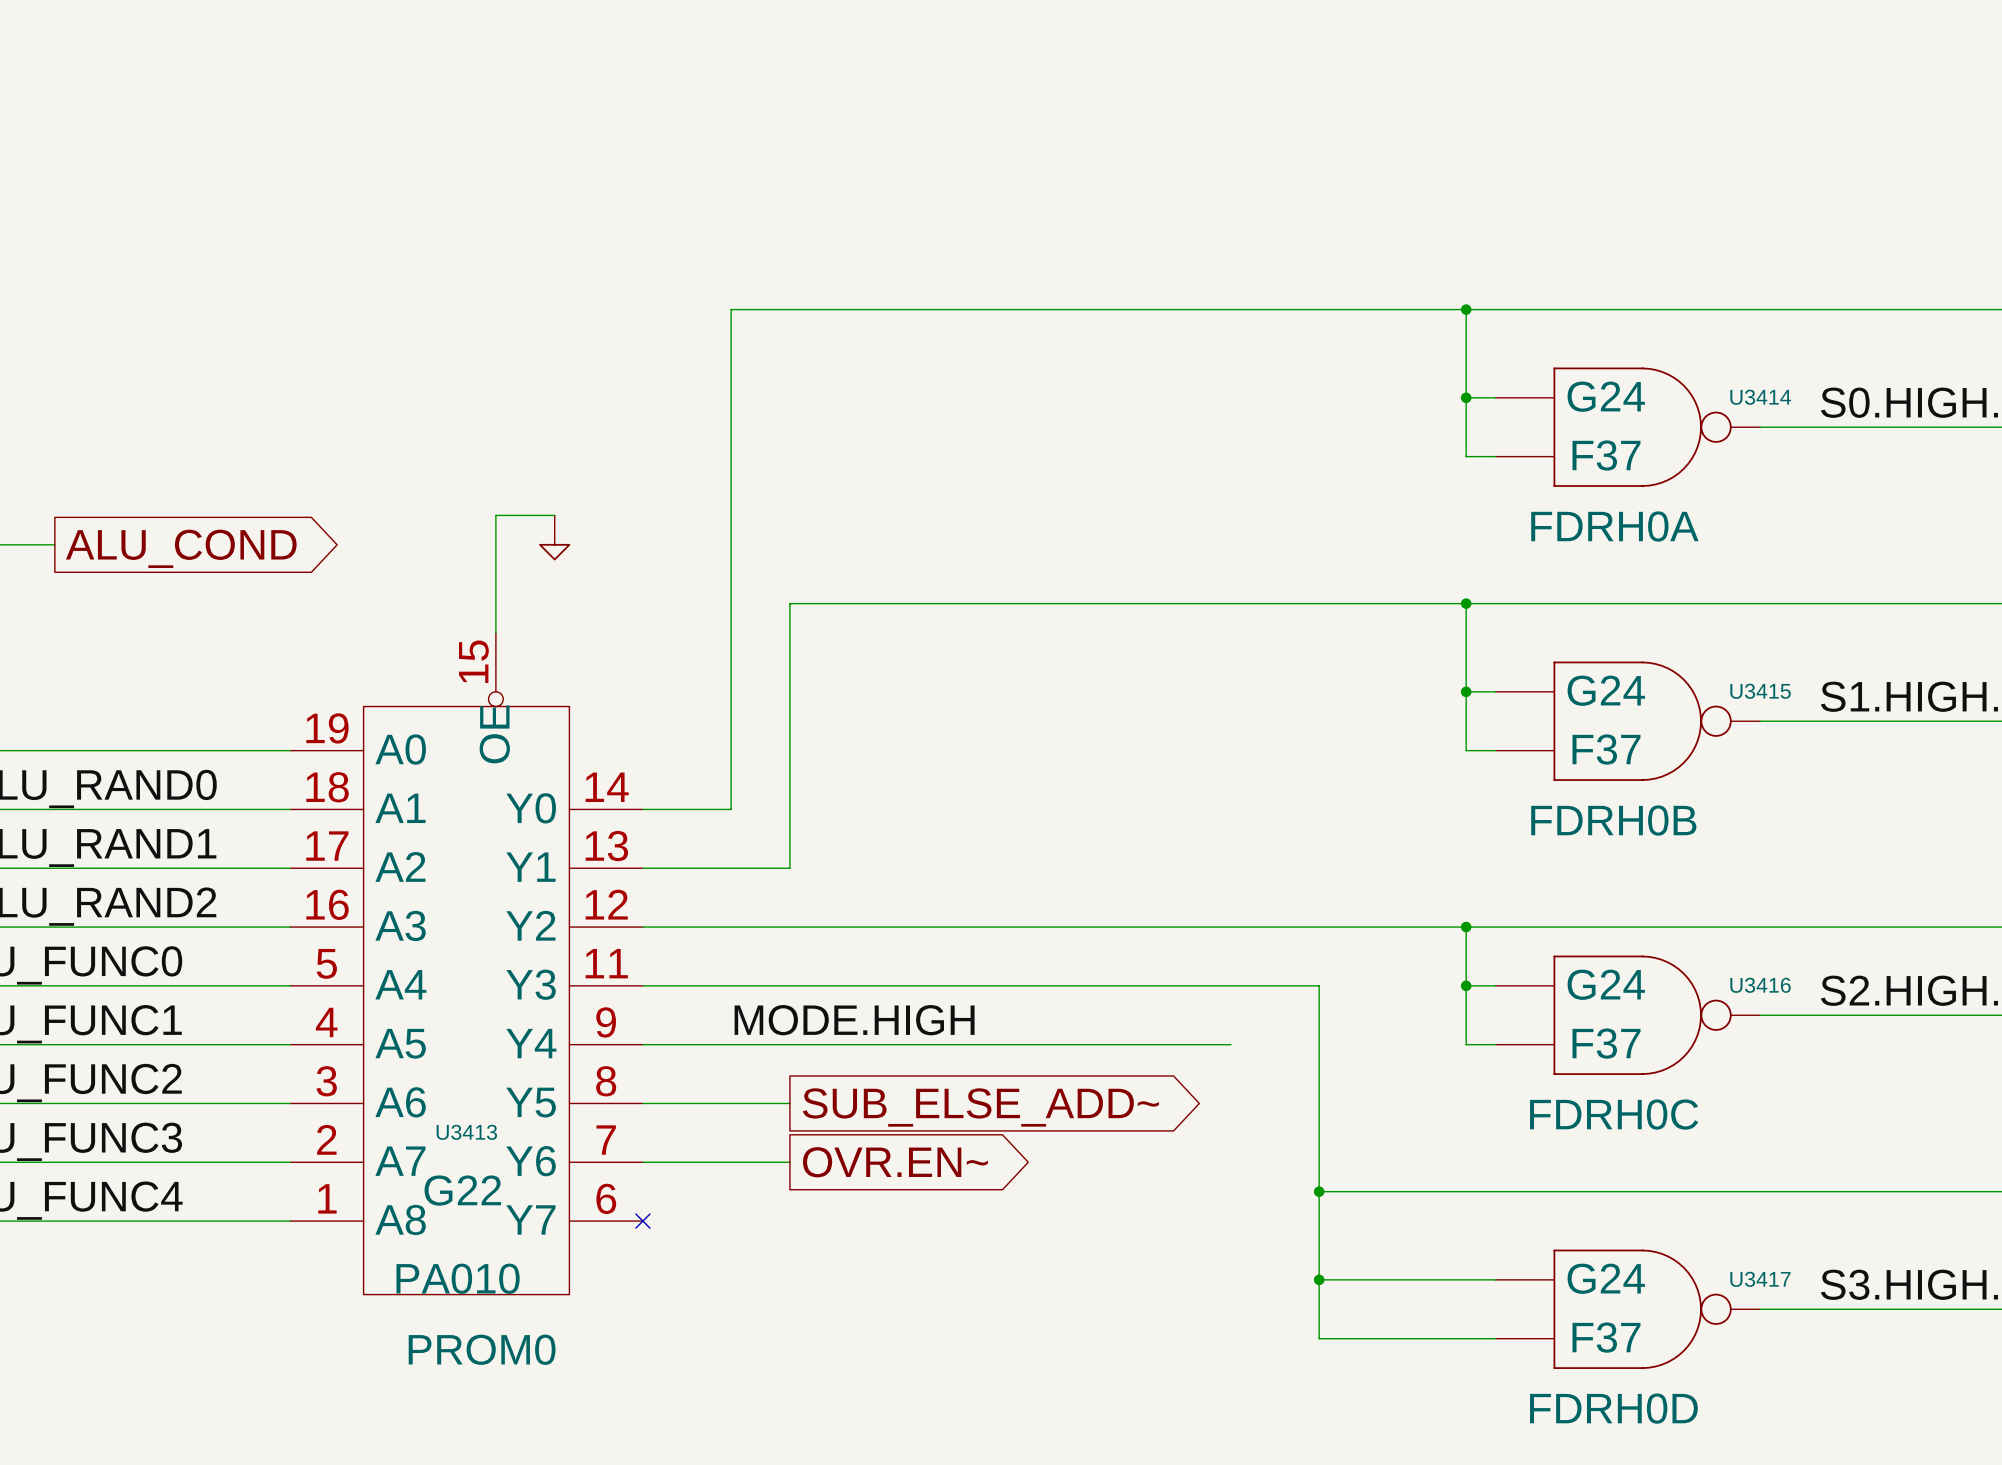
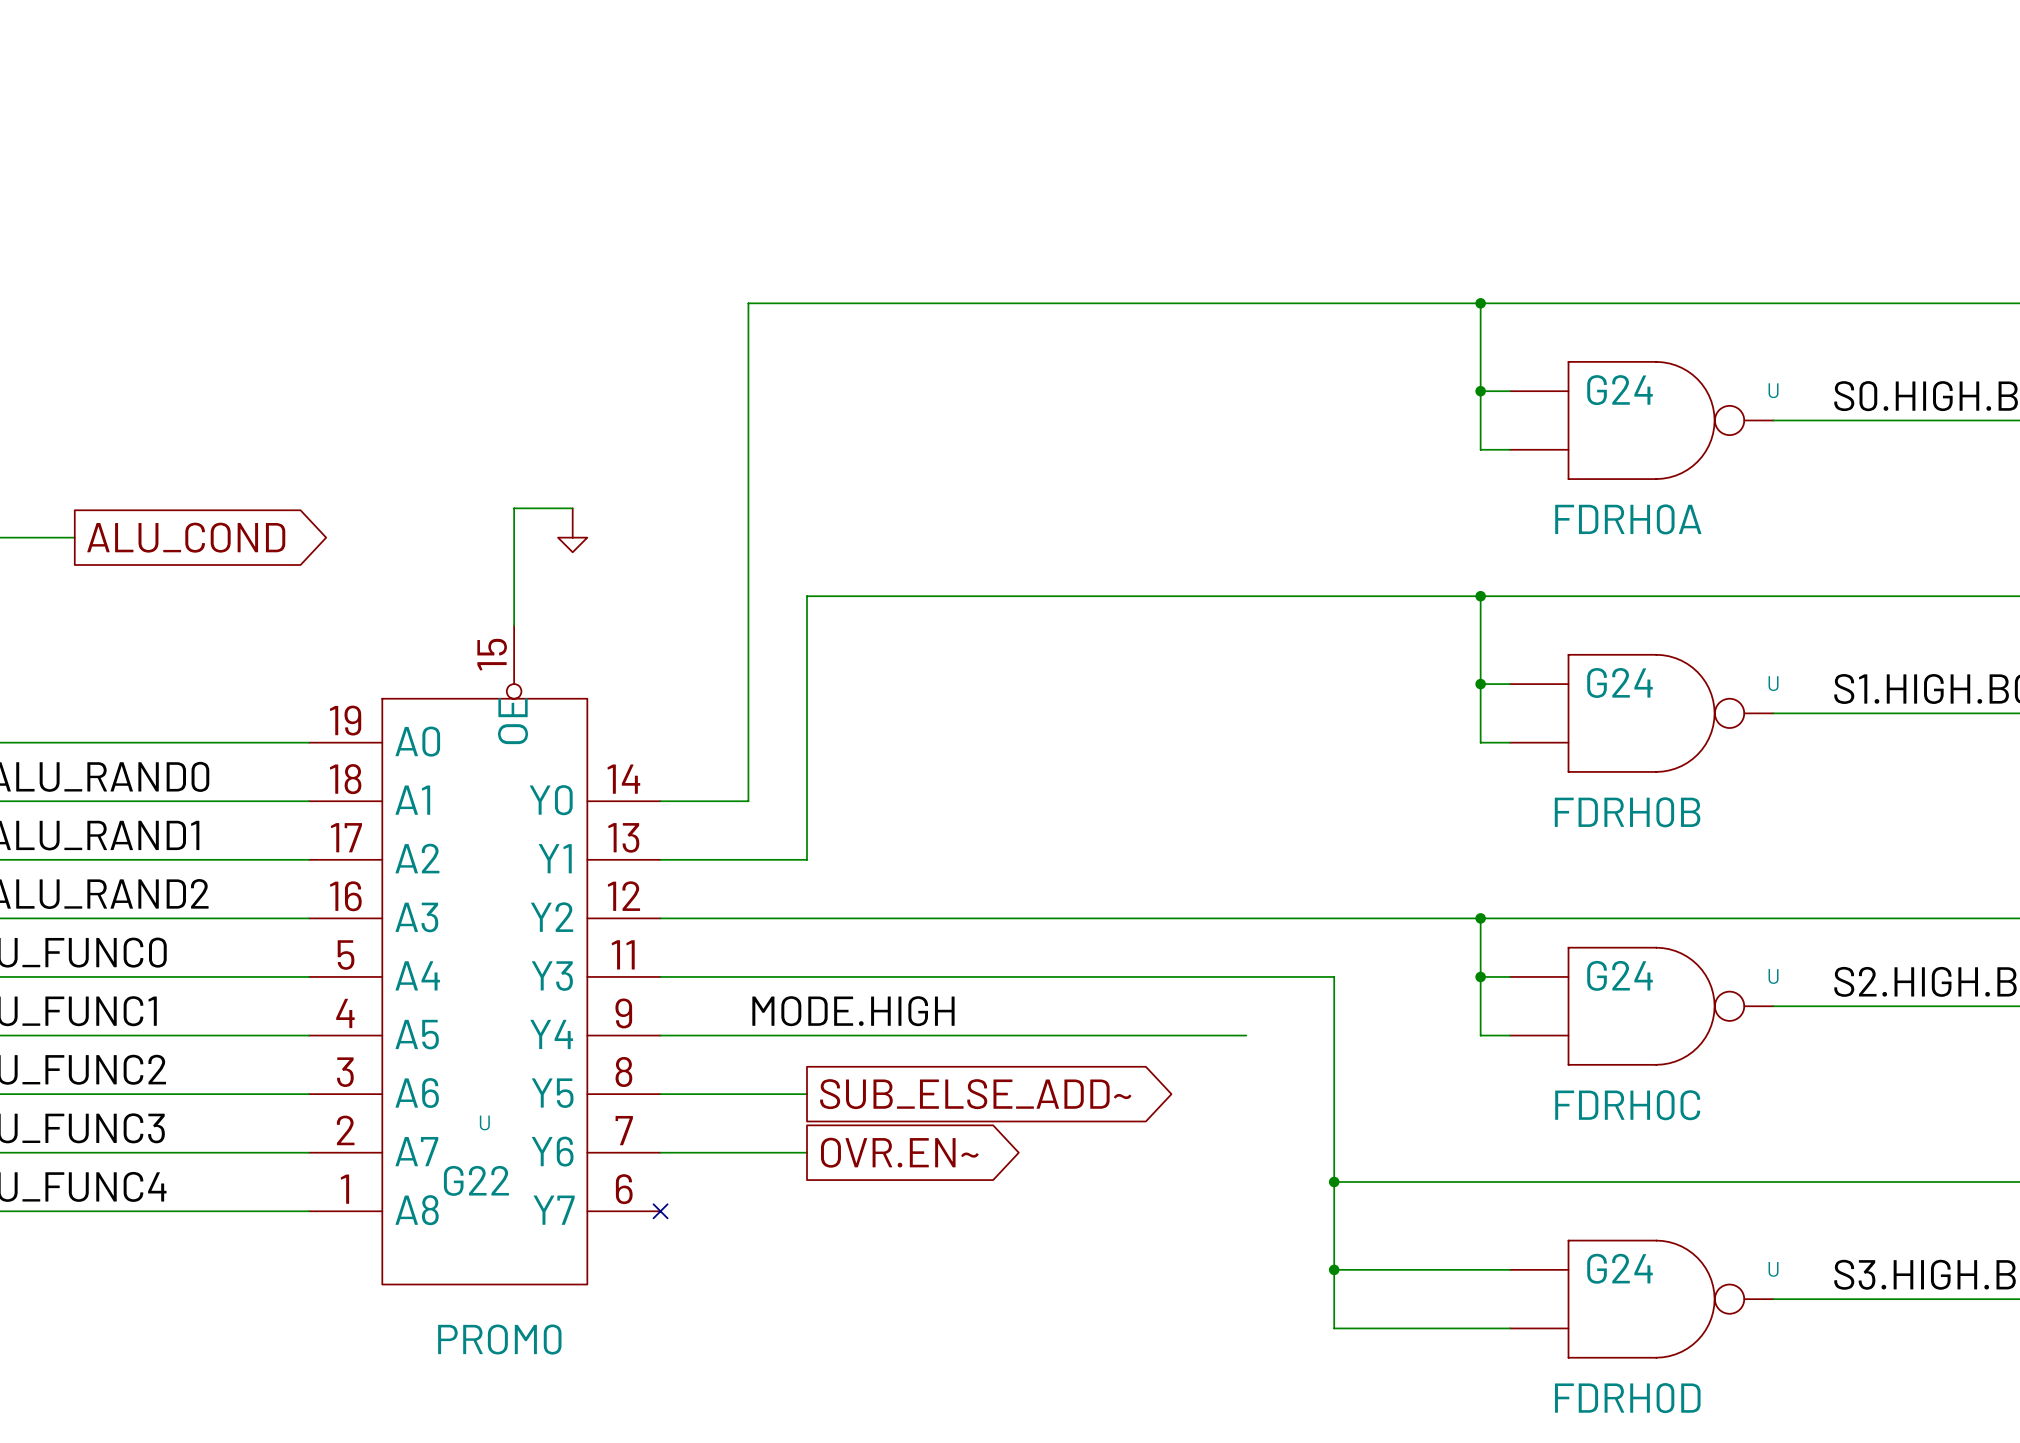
U3414 name: U3414 (1760, 397) -> U (1773, 390)
U3414 value: F37 (1606, 455) -> none
U3415 name: U3415 (1760, 691) -> U (1773, 683)
U3415 value: F37 (1606, 749) -> none
U3416 name: U3416 (1760, 985) -> U (1773, 976)
U3416 value: F37 (1606, 1043) -> none
U3413 name: U3413 (466, 1132) -> U (484, 1122)
U3413 value: PA010 (458, 1278) -> none
U3417 name: U3417 (1760, 1279) -> U (1773, 1269)
U3417 value: F37 (1606, 1337) -> none

